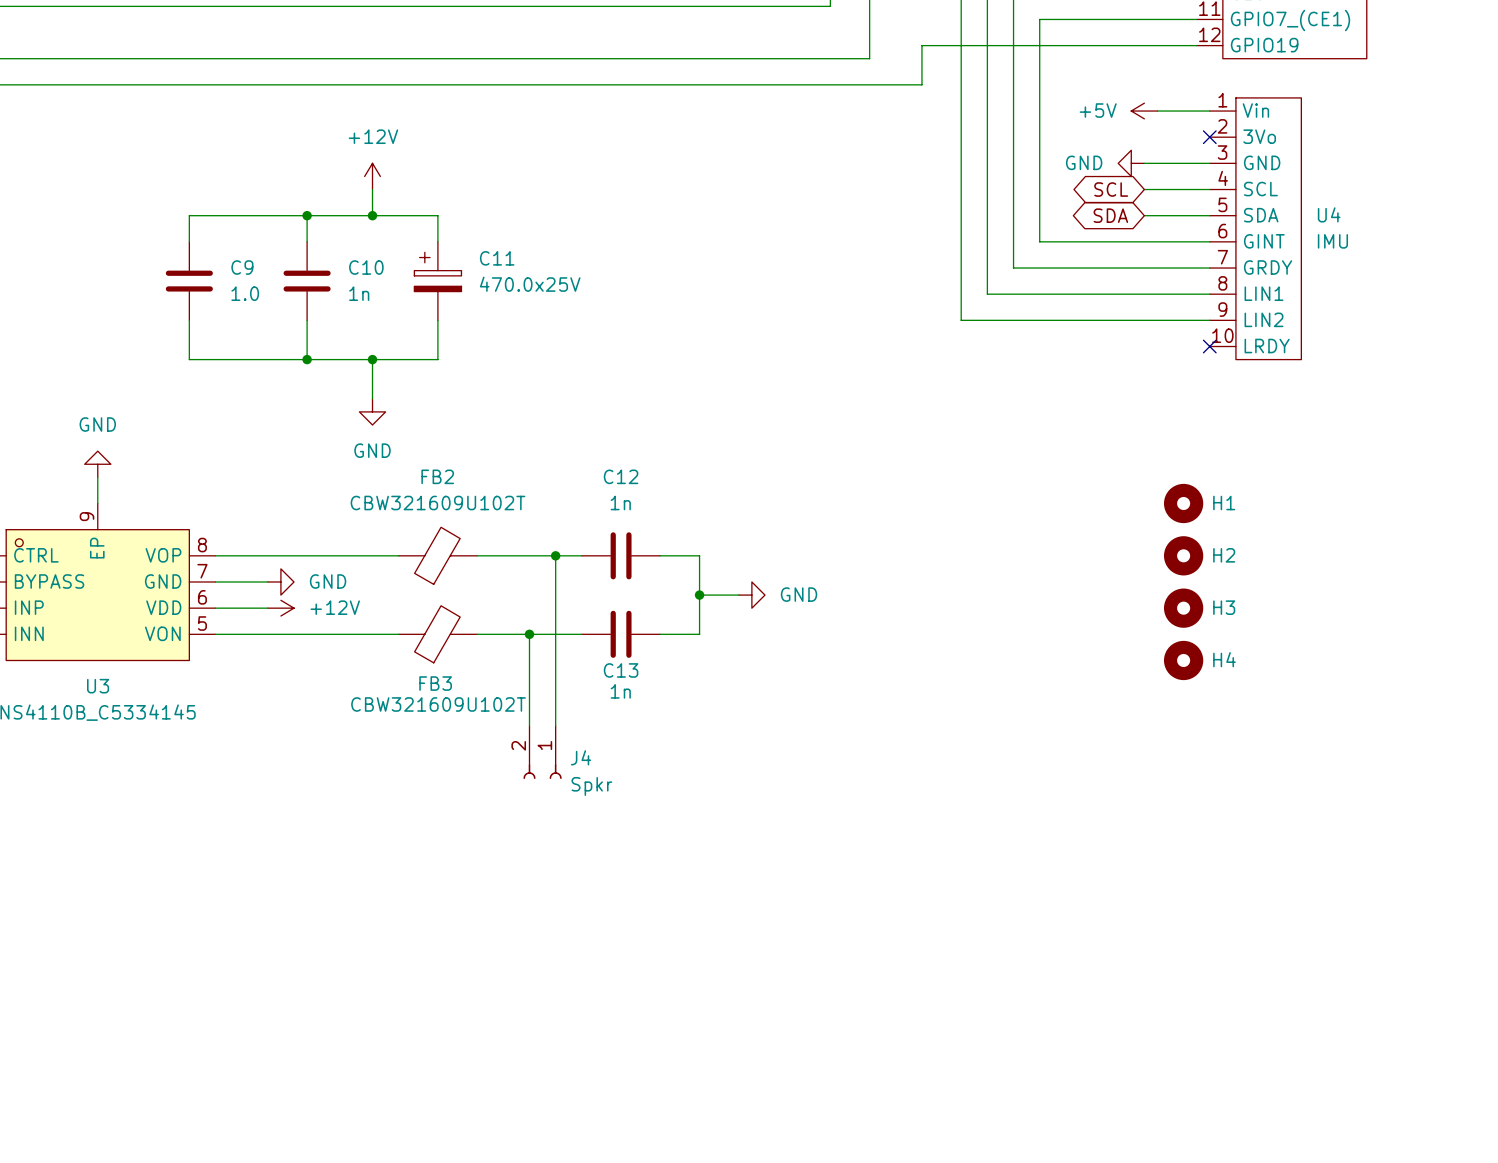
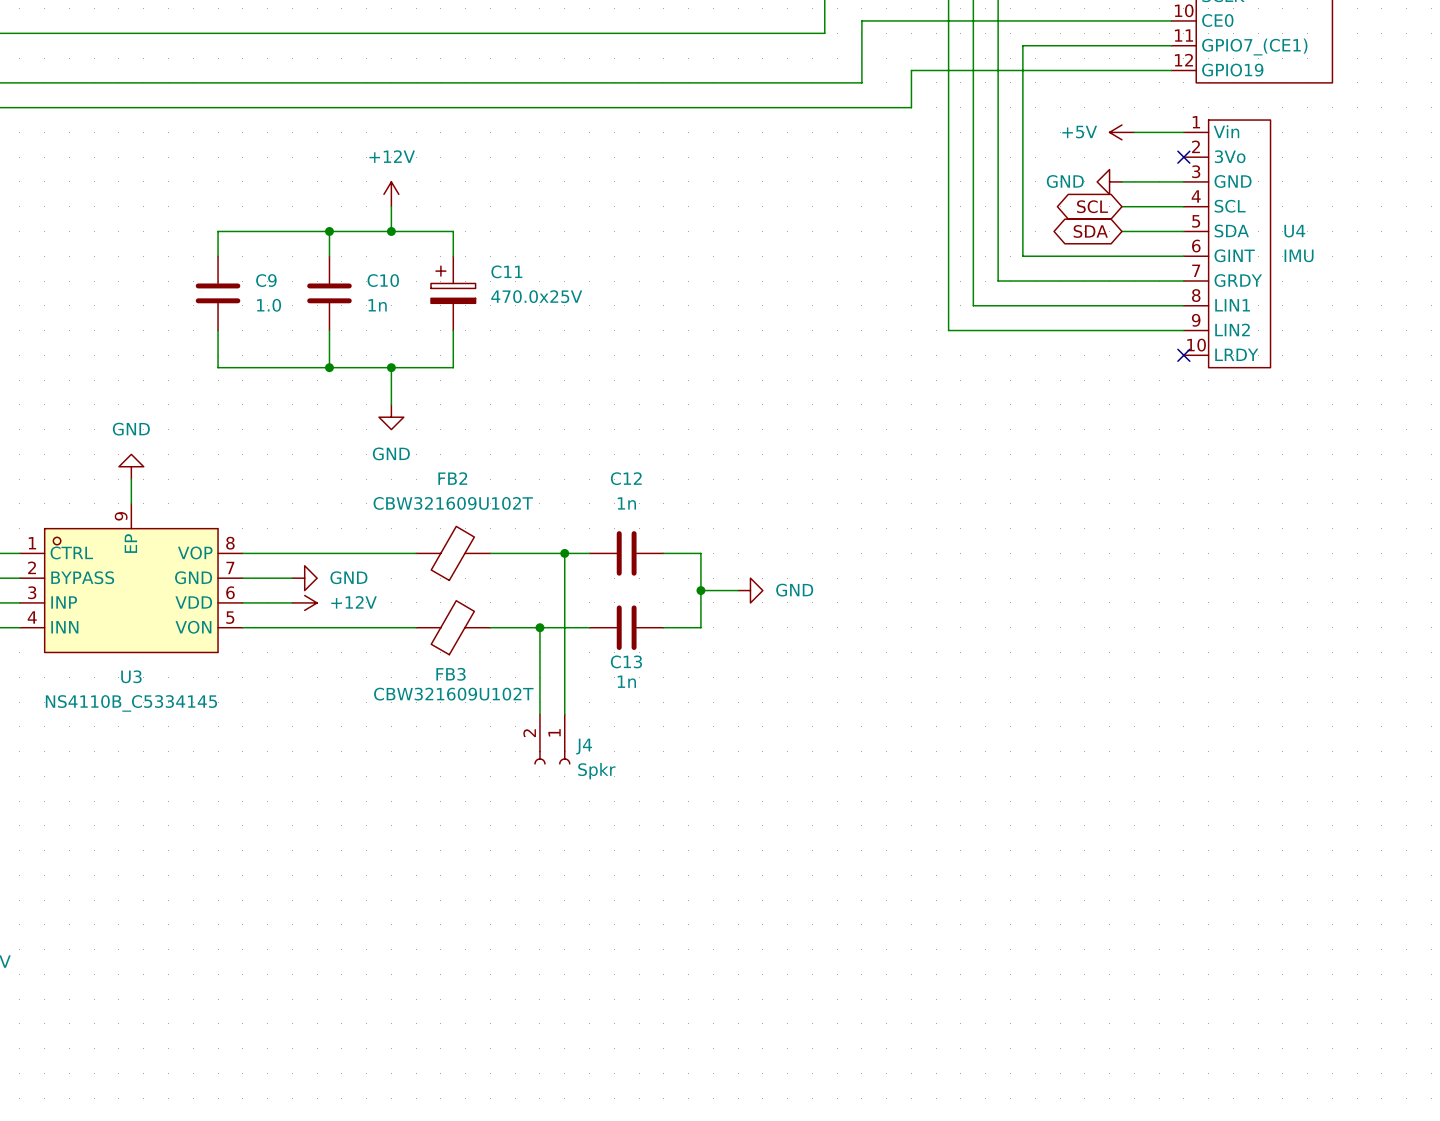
H1: (1183, 503) -> none
H2: (1183, 555) -> none
H3: (1183, 608) -> none
H4: (1183, 660) -> none

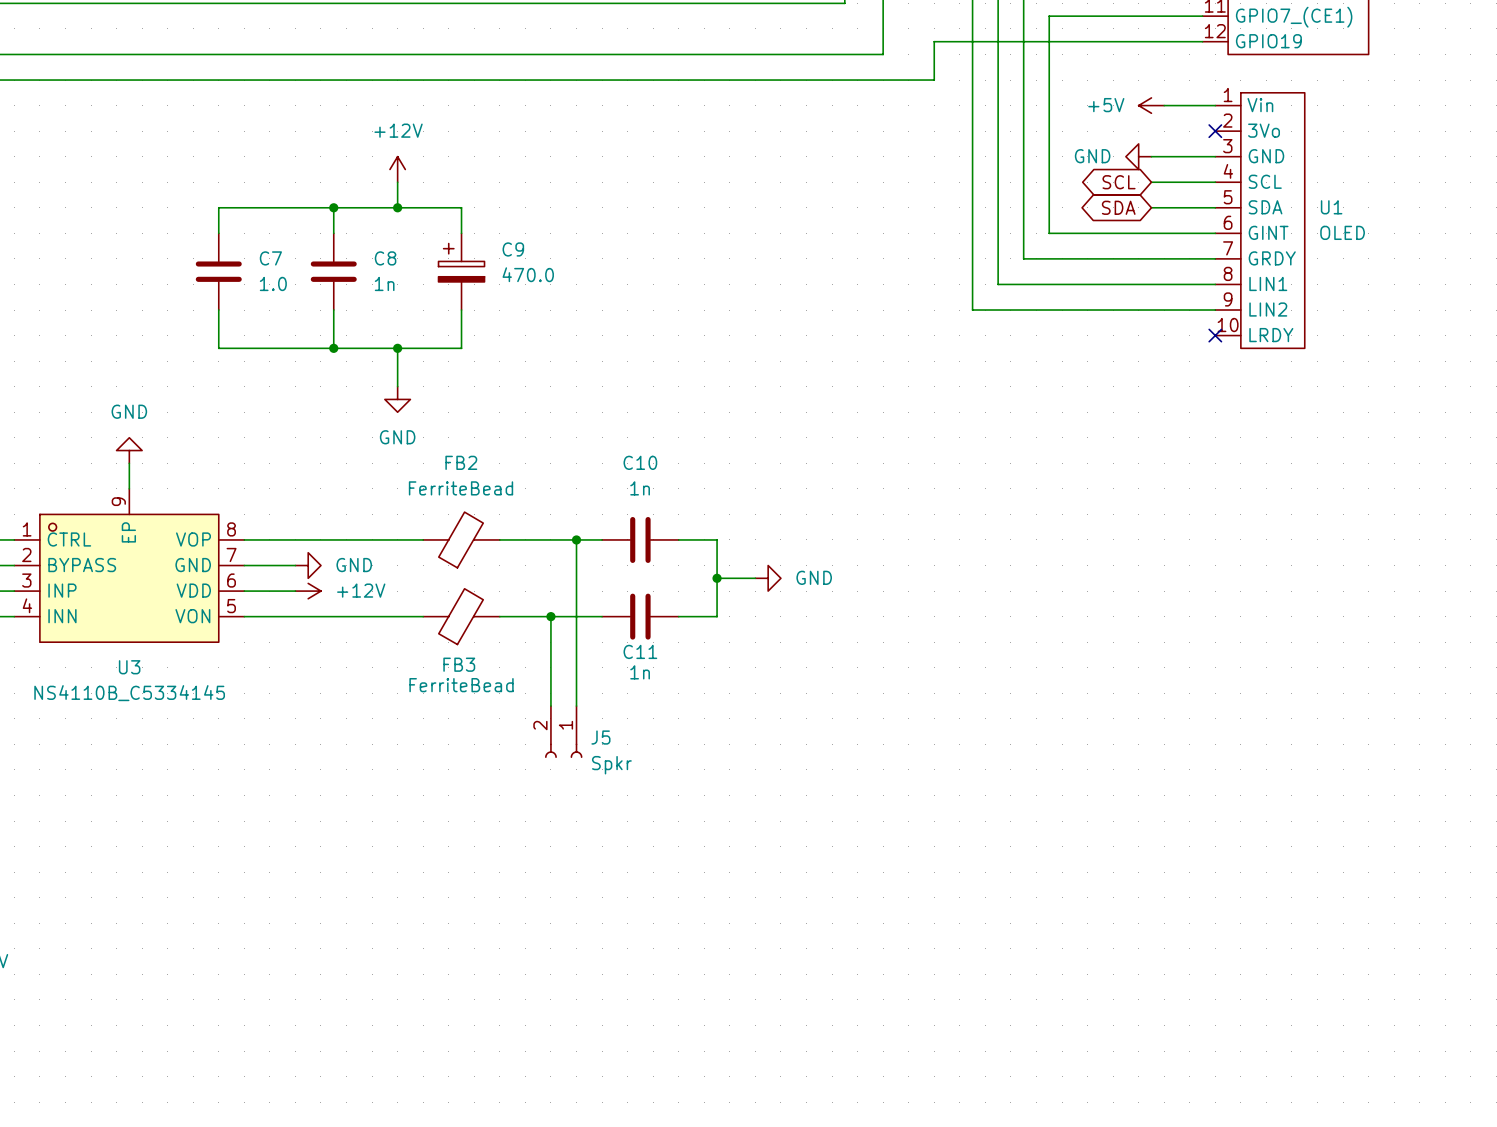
U4 name: U4 (1294, 231) -> U1 (1331, 207)
U4 value: IMU (1299, 255) -> OLED (1342, 232)
C11 name: C11 (506, 271) -> C9 (513, 249)
C9 name: C9 (266, 280) -> C7 (270, 258)
C10 name: C10 (383, 280) -> C8 (385, 258)
C11 value: 470.0x25V (536, 296) -> 470.0 (528, 274)
C12 name: C12 (626, 478) -> C10 (640, 462)
FB2 value: CBW321609U102T (453, 503) -> FerriteBead (461, 488)
C13 name: C13 (626, 661) -> C11 (640, 651)
FB3 value: CBW321609U102T (453, 694) -> FerriteBead (461, 685)
J4 name: J4 (584, 746) -> J5 (600, 737)

